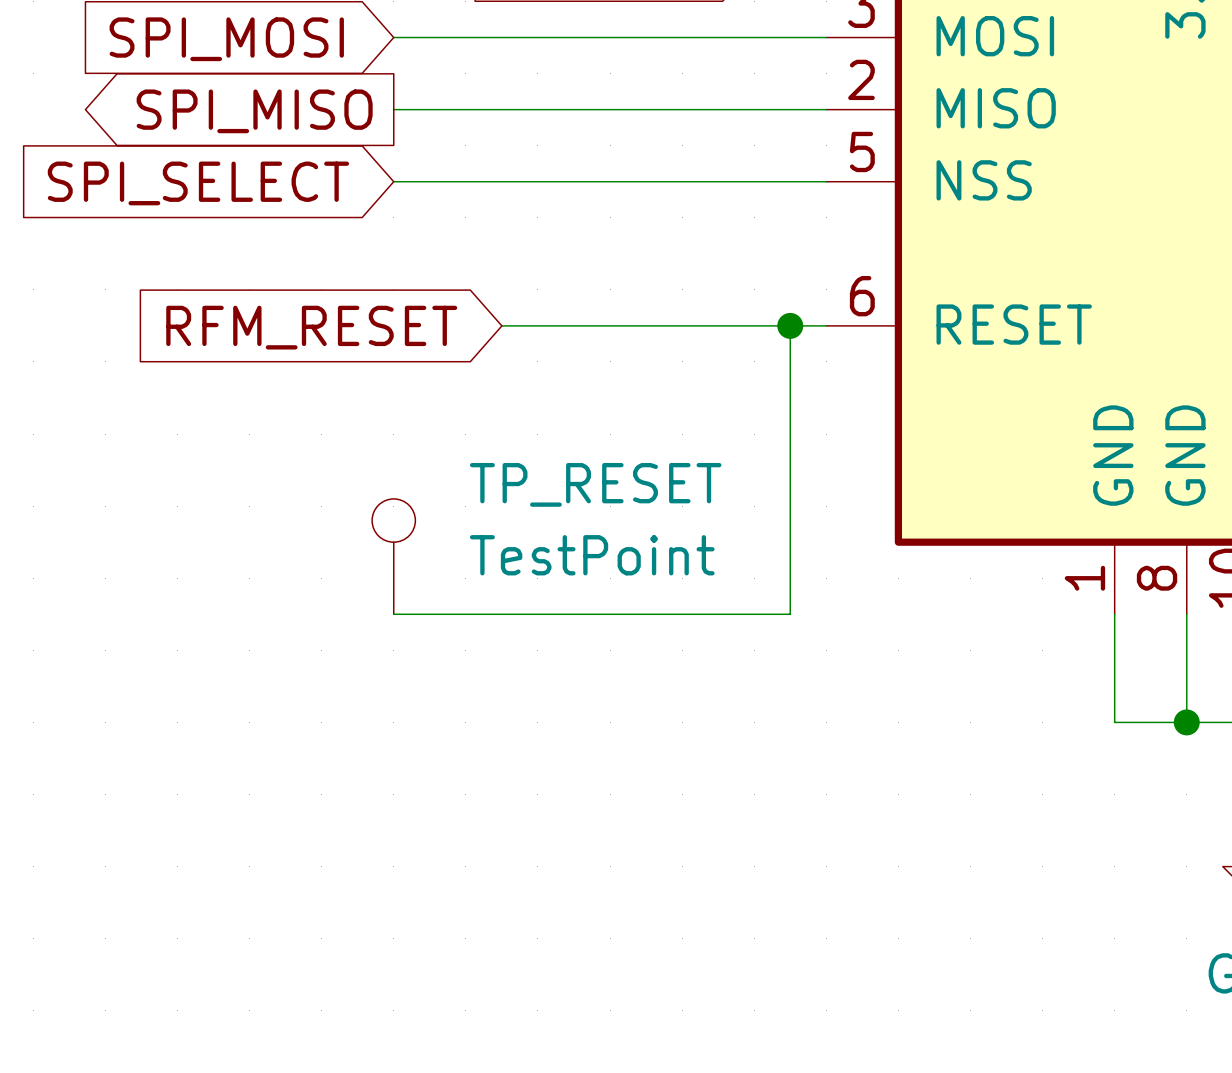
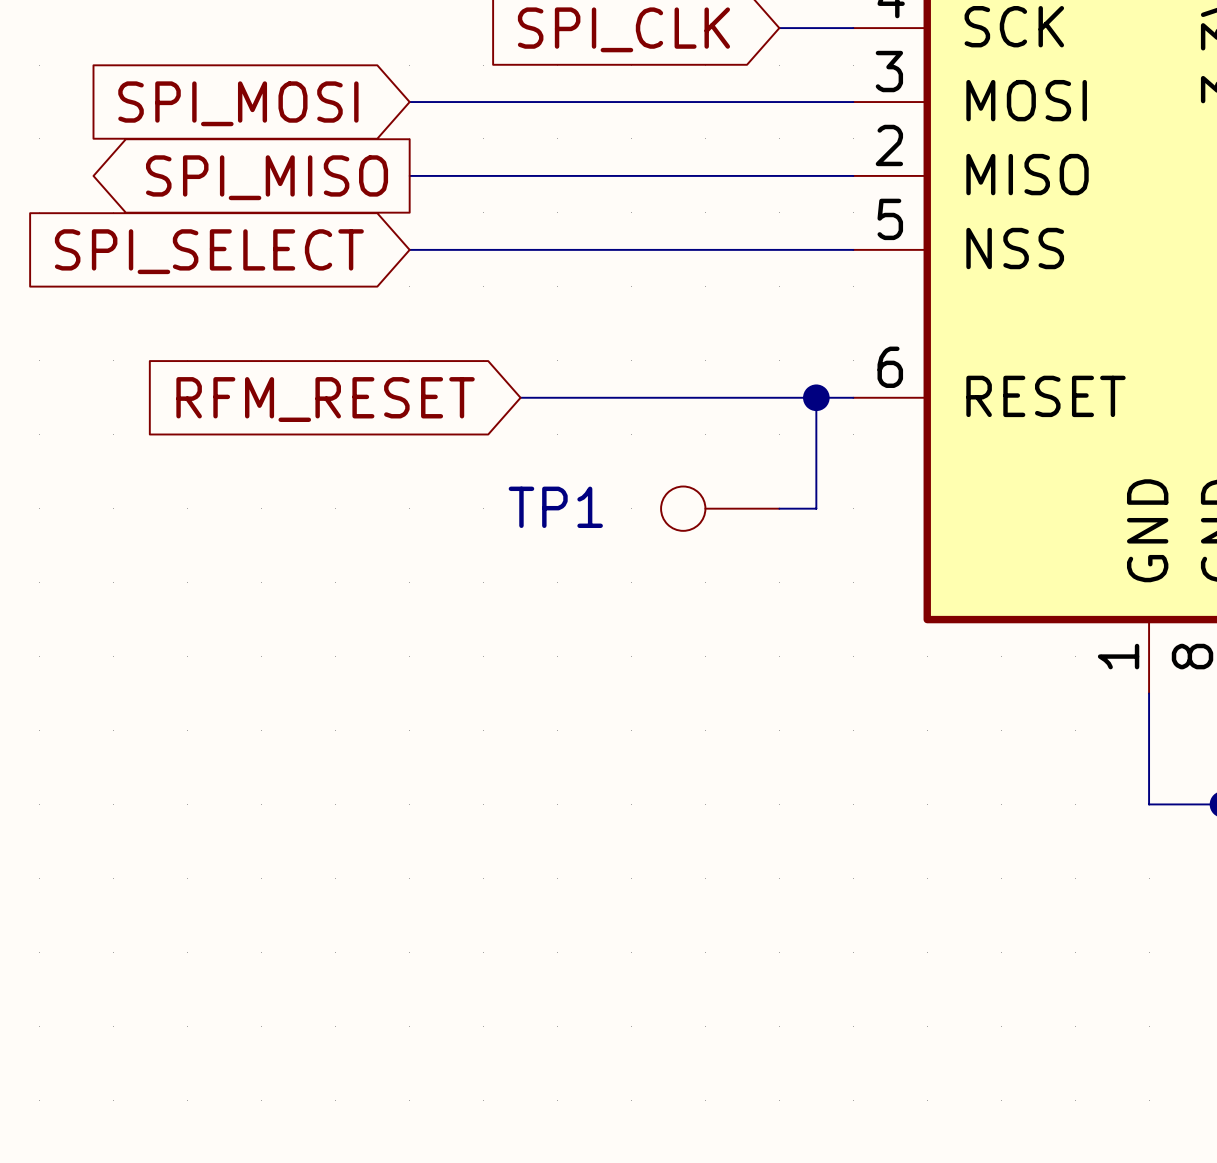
TP1: none -> (720, 508)
wire: (790, 434) (790, 614) (393, 614) -> (816, 508) (779, 508)
TP_RESET: TestPoint (393, 556) -> none

